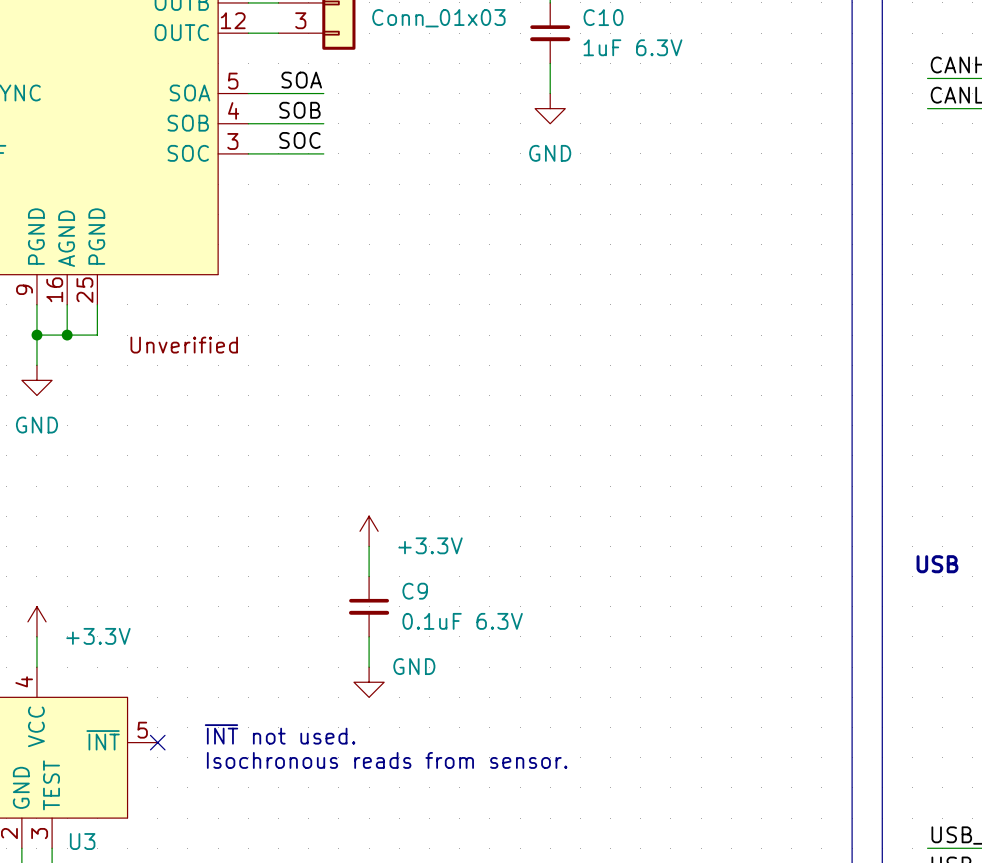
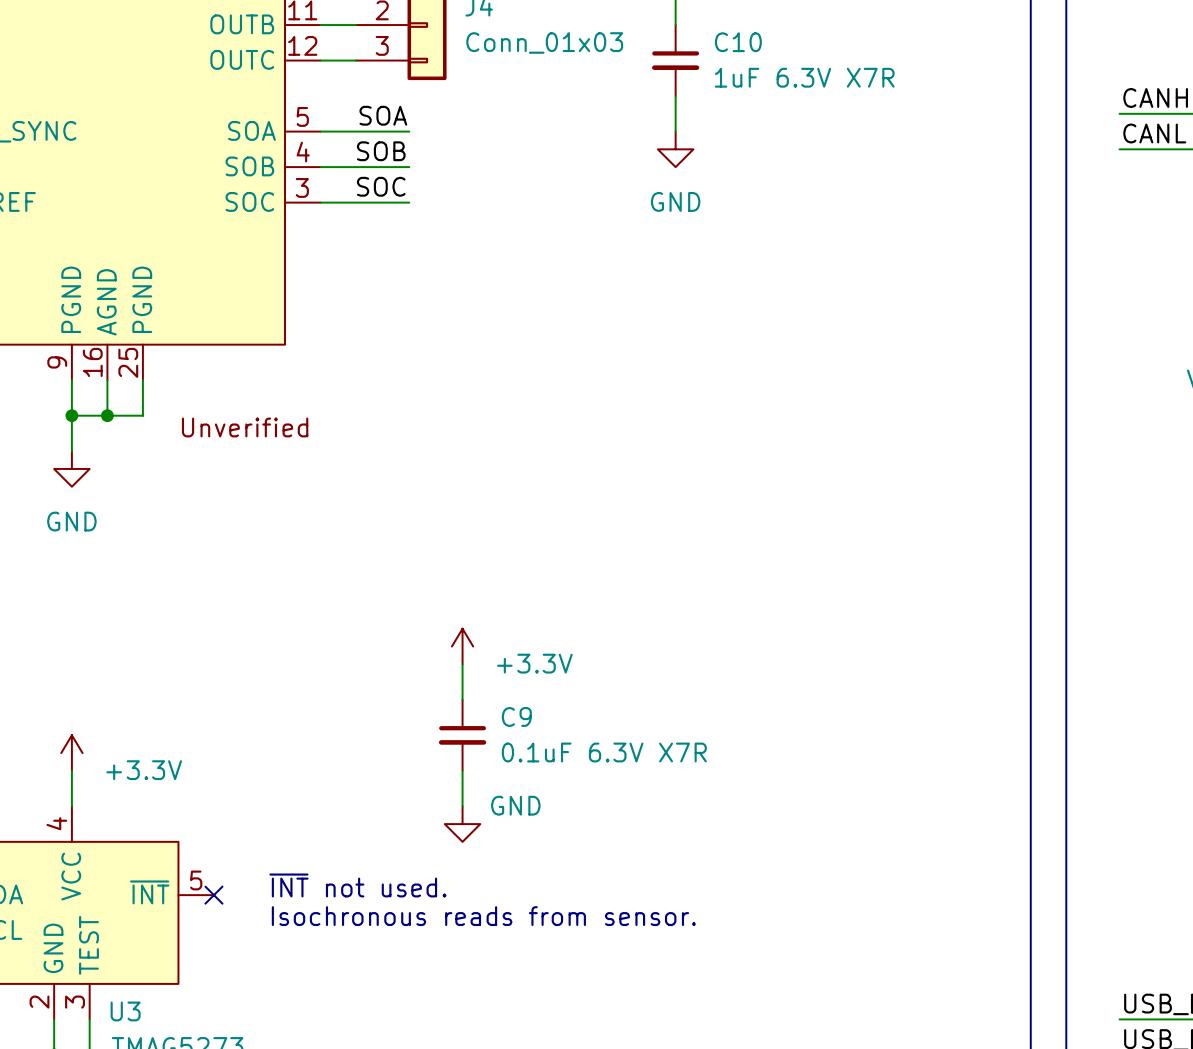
C10 value: 1uF 6.3V (632, 47) -> 1uF 6.3V X7R (804, 77)
text: USB (937, 564) -> none
C9 value: 0.1uF 6.3V (462, 621) -> 0.1uF 6.3V X7R (604, 752)

